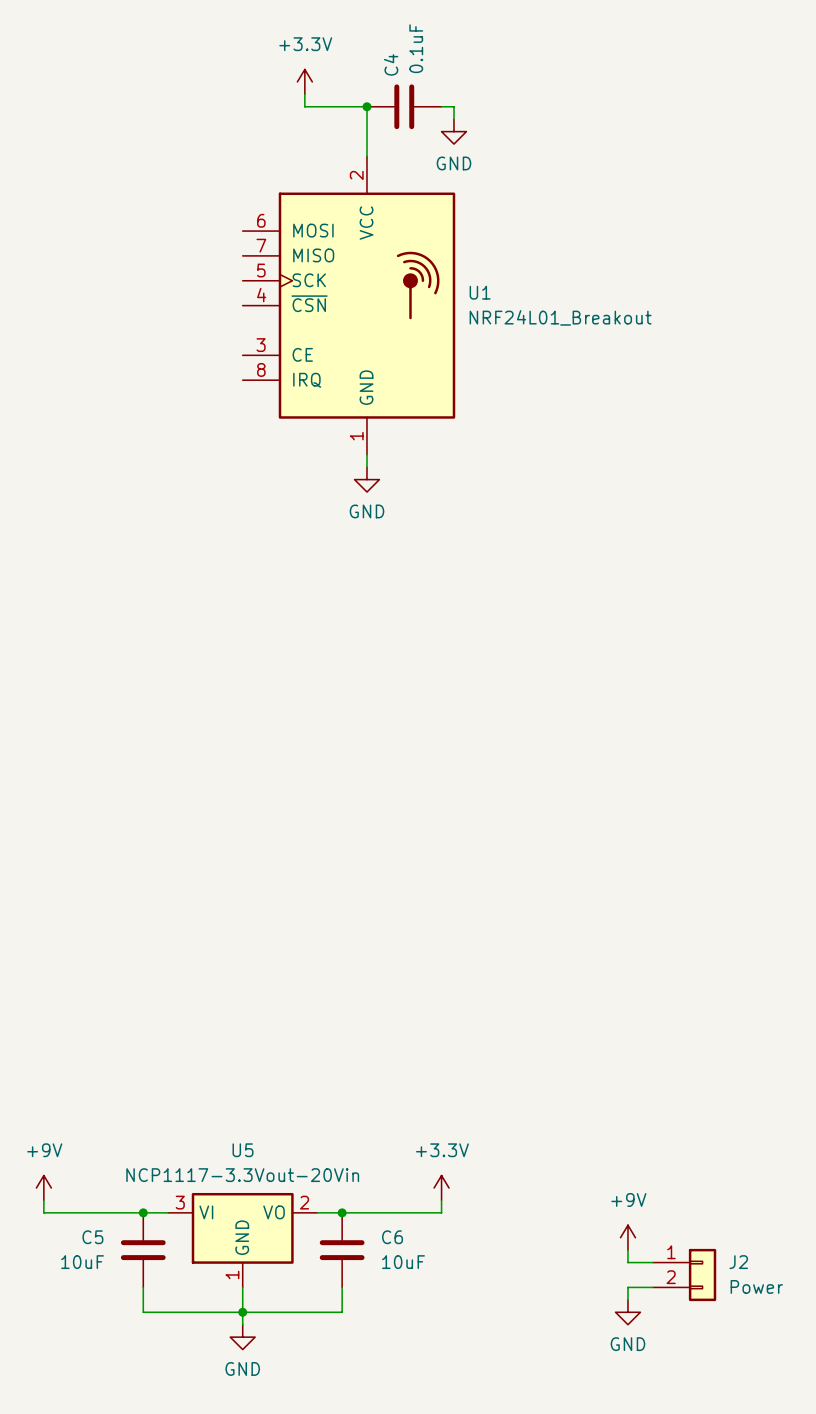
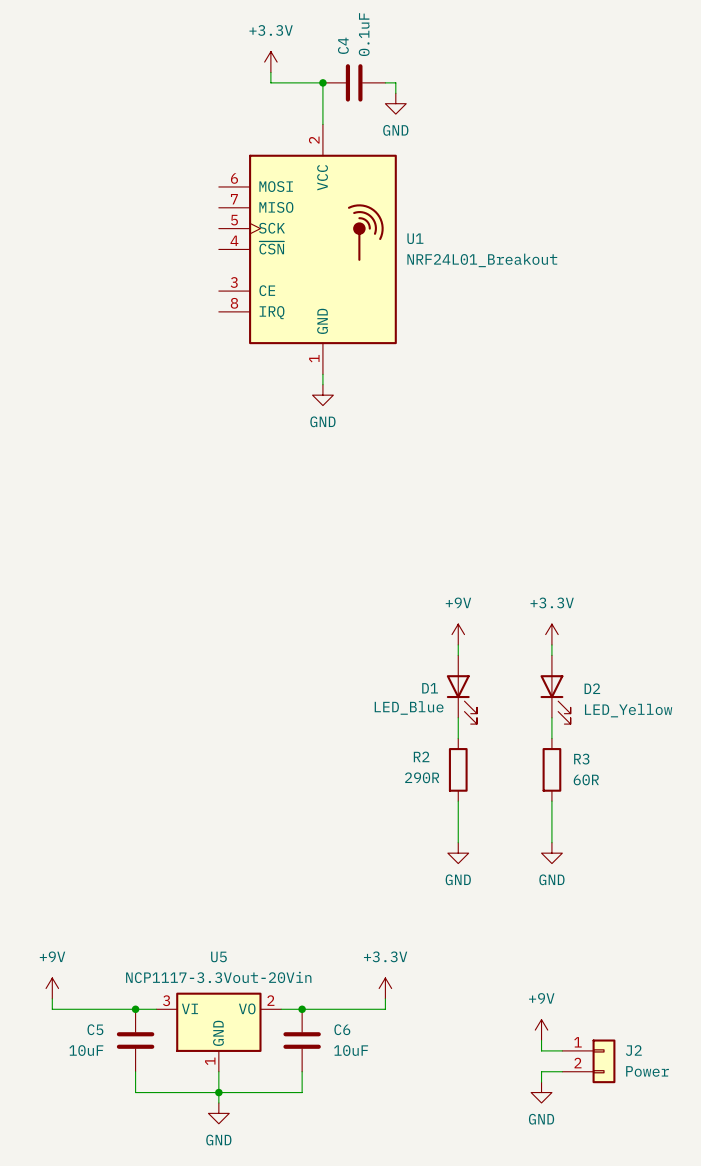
power symbol: none -> +9V (458, 634)
power symbol: none -> +3.3V (551, 634)
wire: none -> (458, 644) (458, 655)
wire: none -> (551, 644) (551, 655)
D1: none -> LED_Blue (461, 689)
D2: none -> LED_Yellow (555, 689)
wire: none -> (458, 717) (458, 738)
wire: none -> (551, 717) (551, 738)
R2: none -> 290R (458, 769)
R3: none -> 60R (551, 769)
wire: none -> (458, 801) (458, 842)
wire: none -> (551, 801) (551, 842)
power symbol: none -> GND (458, 853)
power symbol: none -> GND (551, 853)

